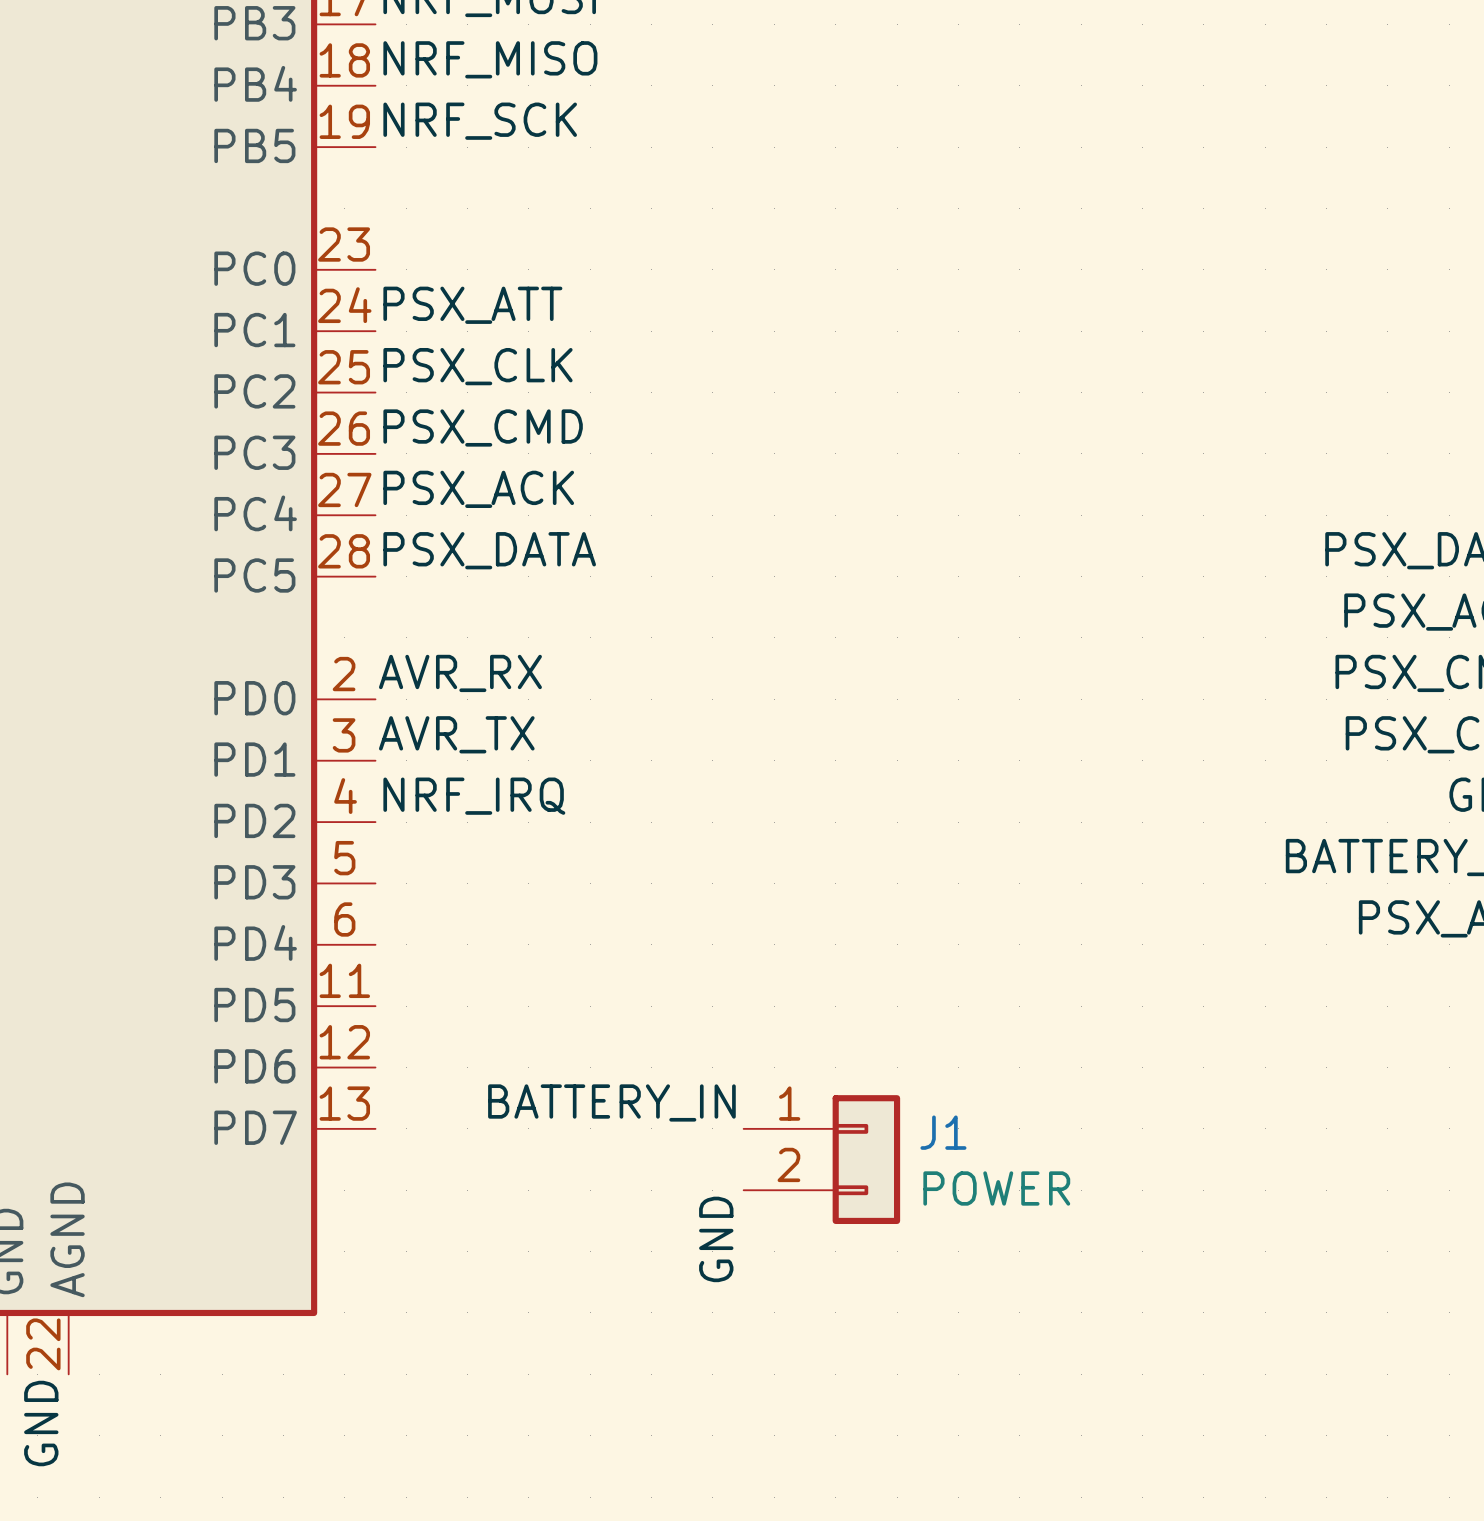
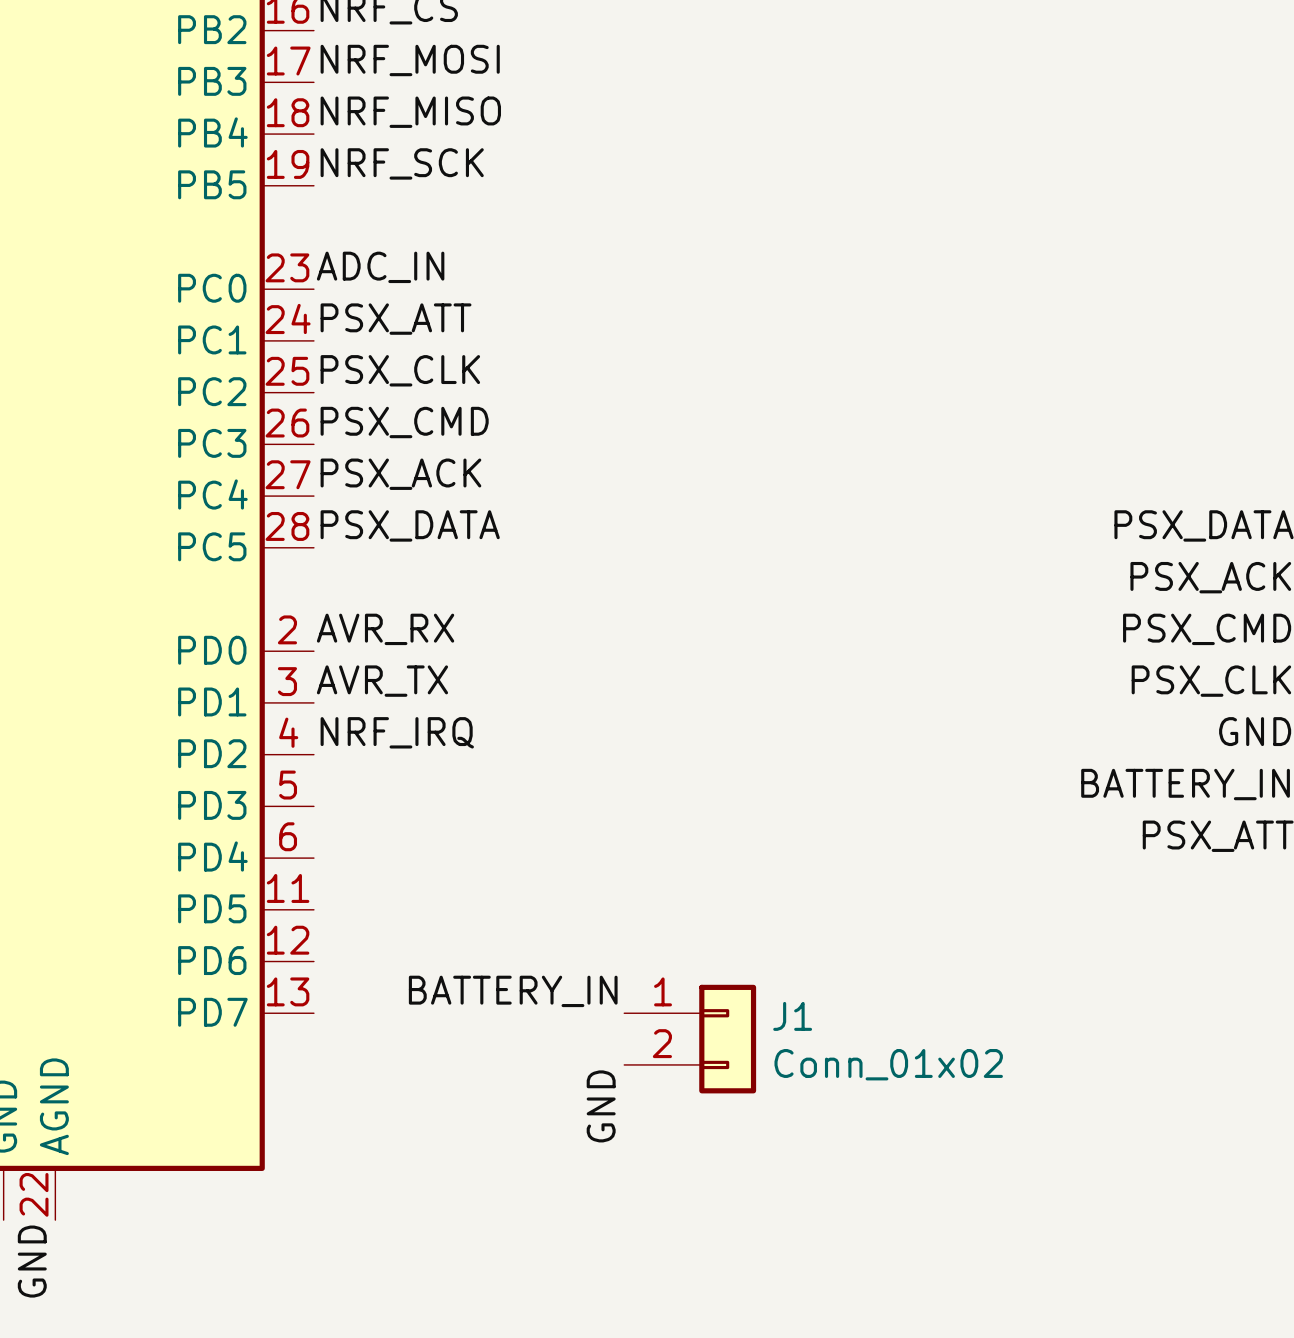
label: none -> ADC_IN (380, 267)
J1 value: POWER (996, 1188) -> Conn_01x02 (888, 1064)

